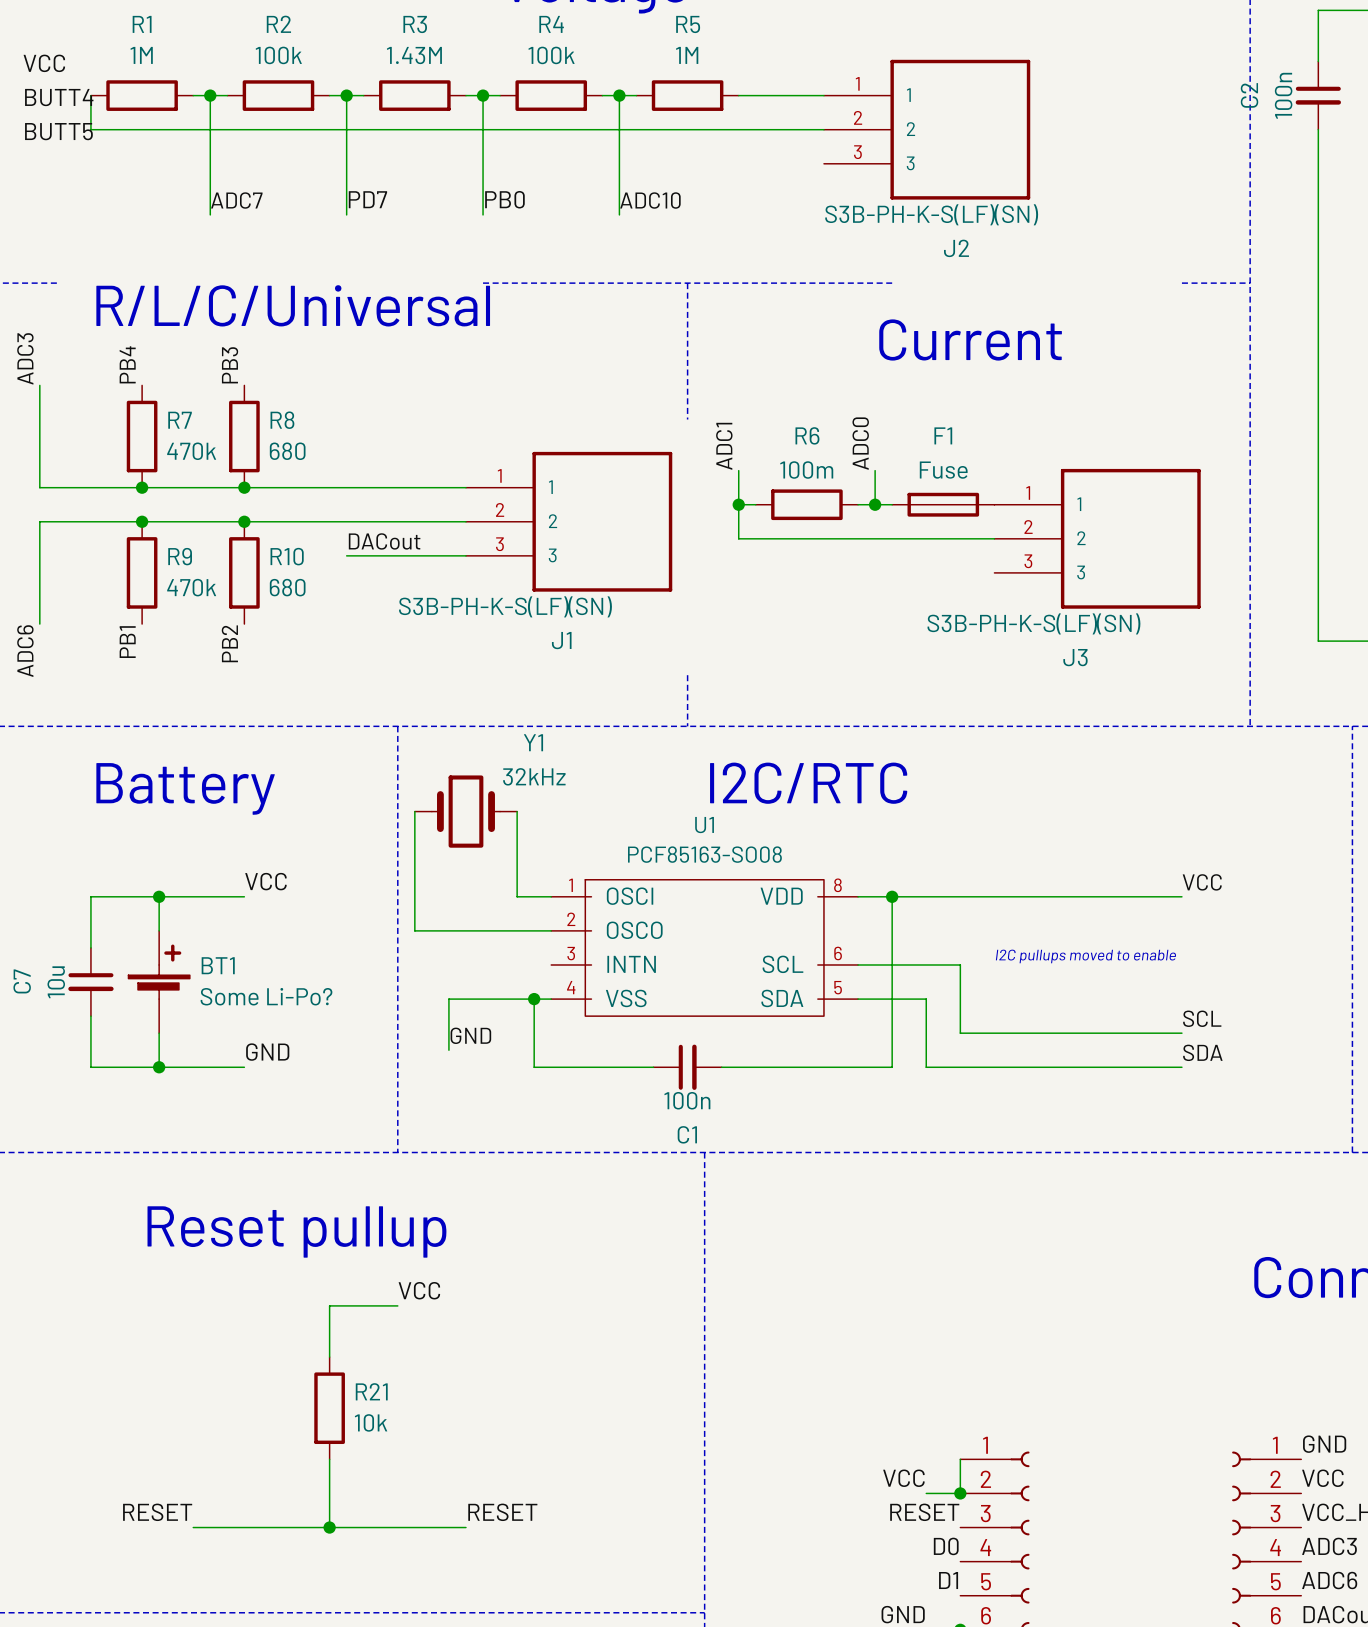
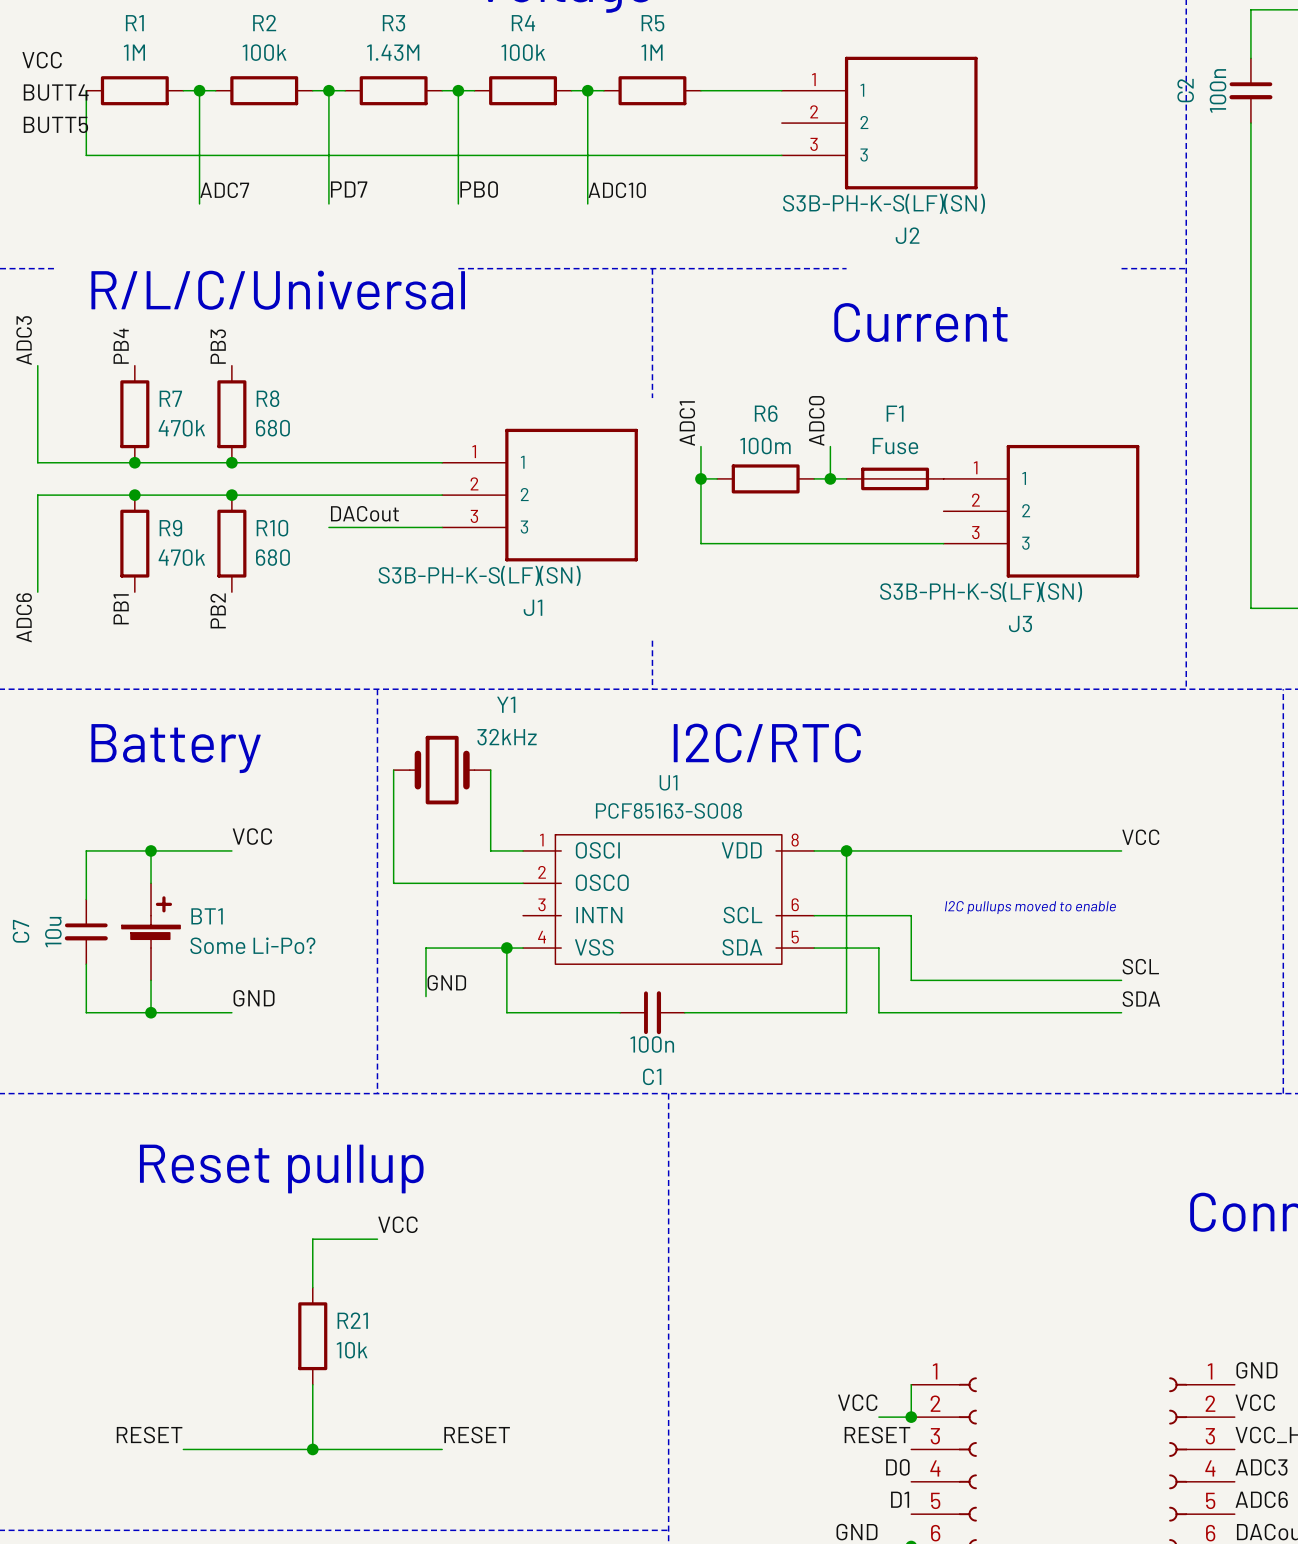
wire: (90, 129) (823, 129) -> (86, 123) (86, 155) (781, 155)
wire: (738, 538) (994, 538) -> (700, 511) (700, 543) (943, 543)

